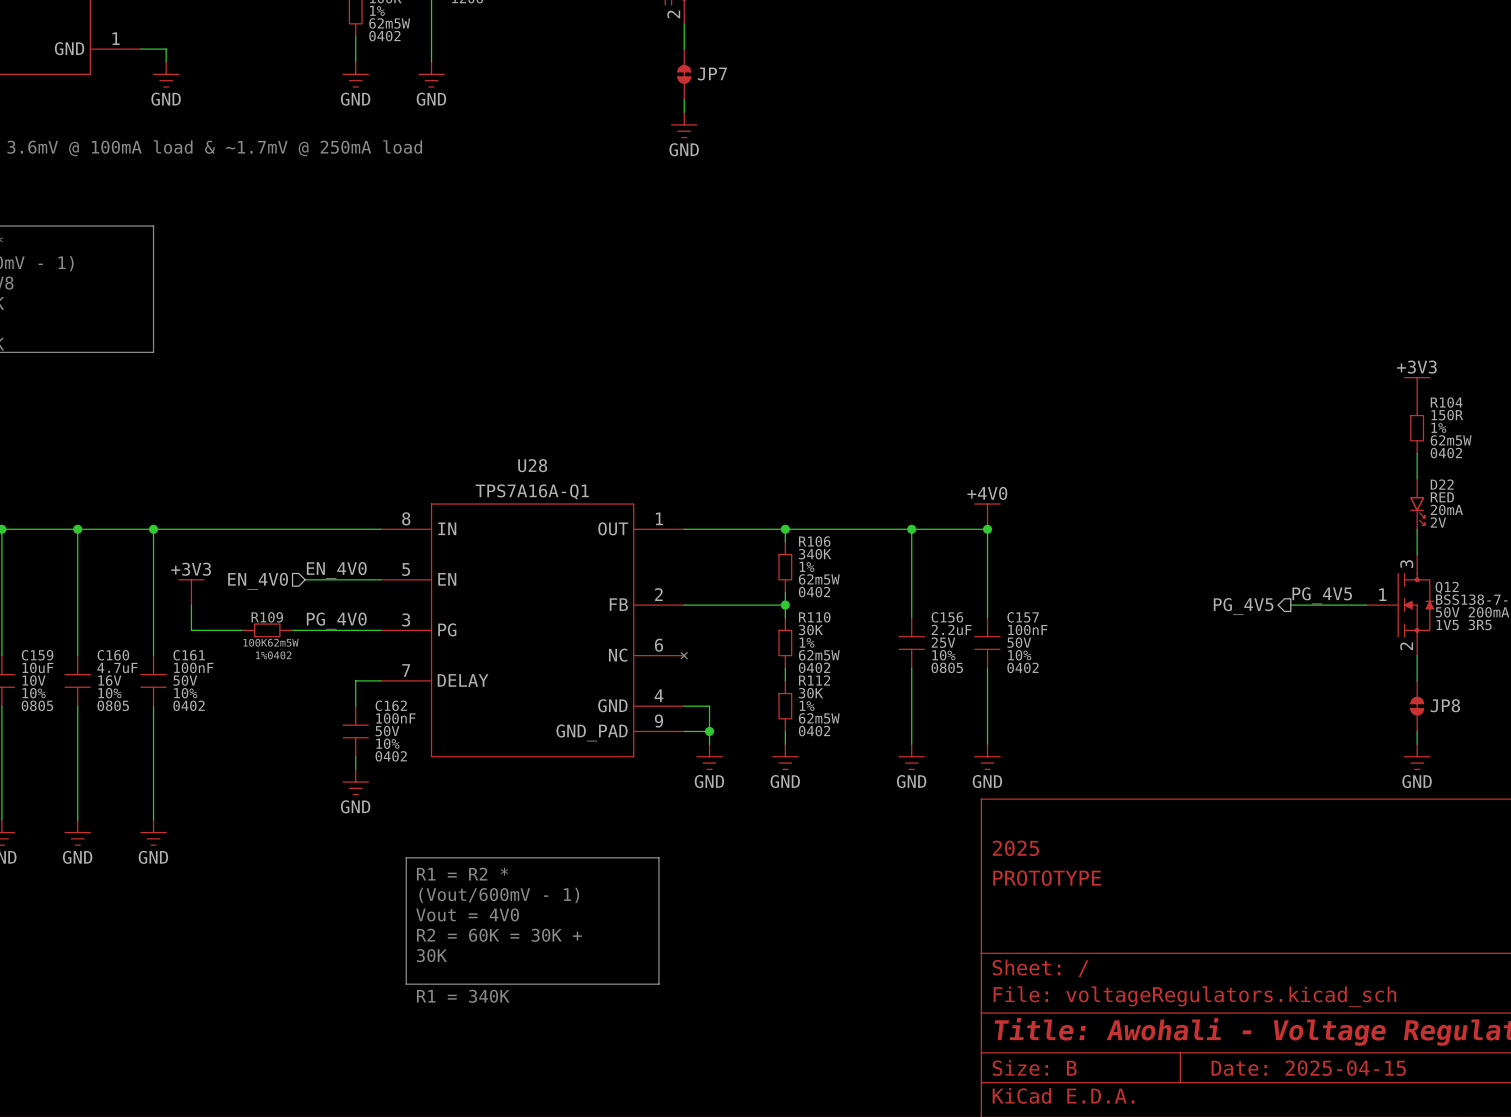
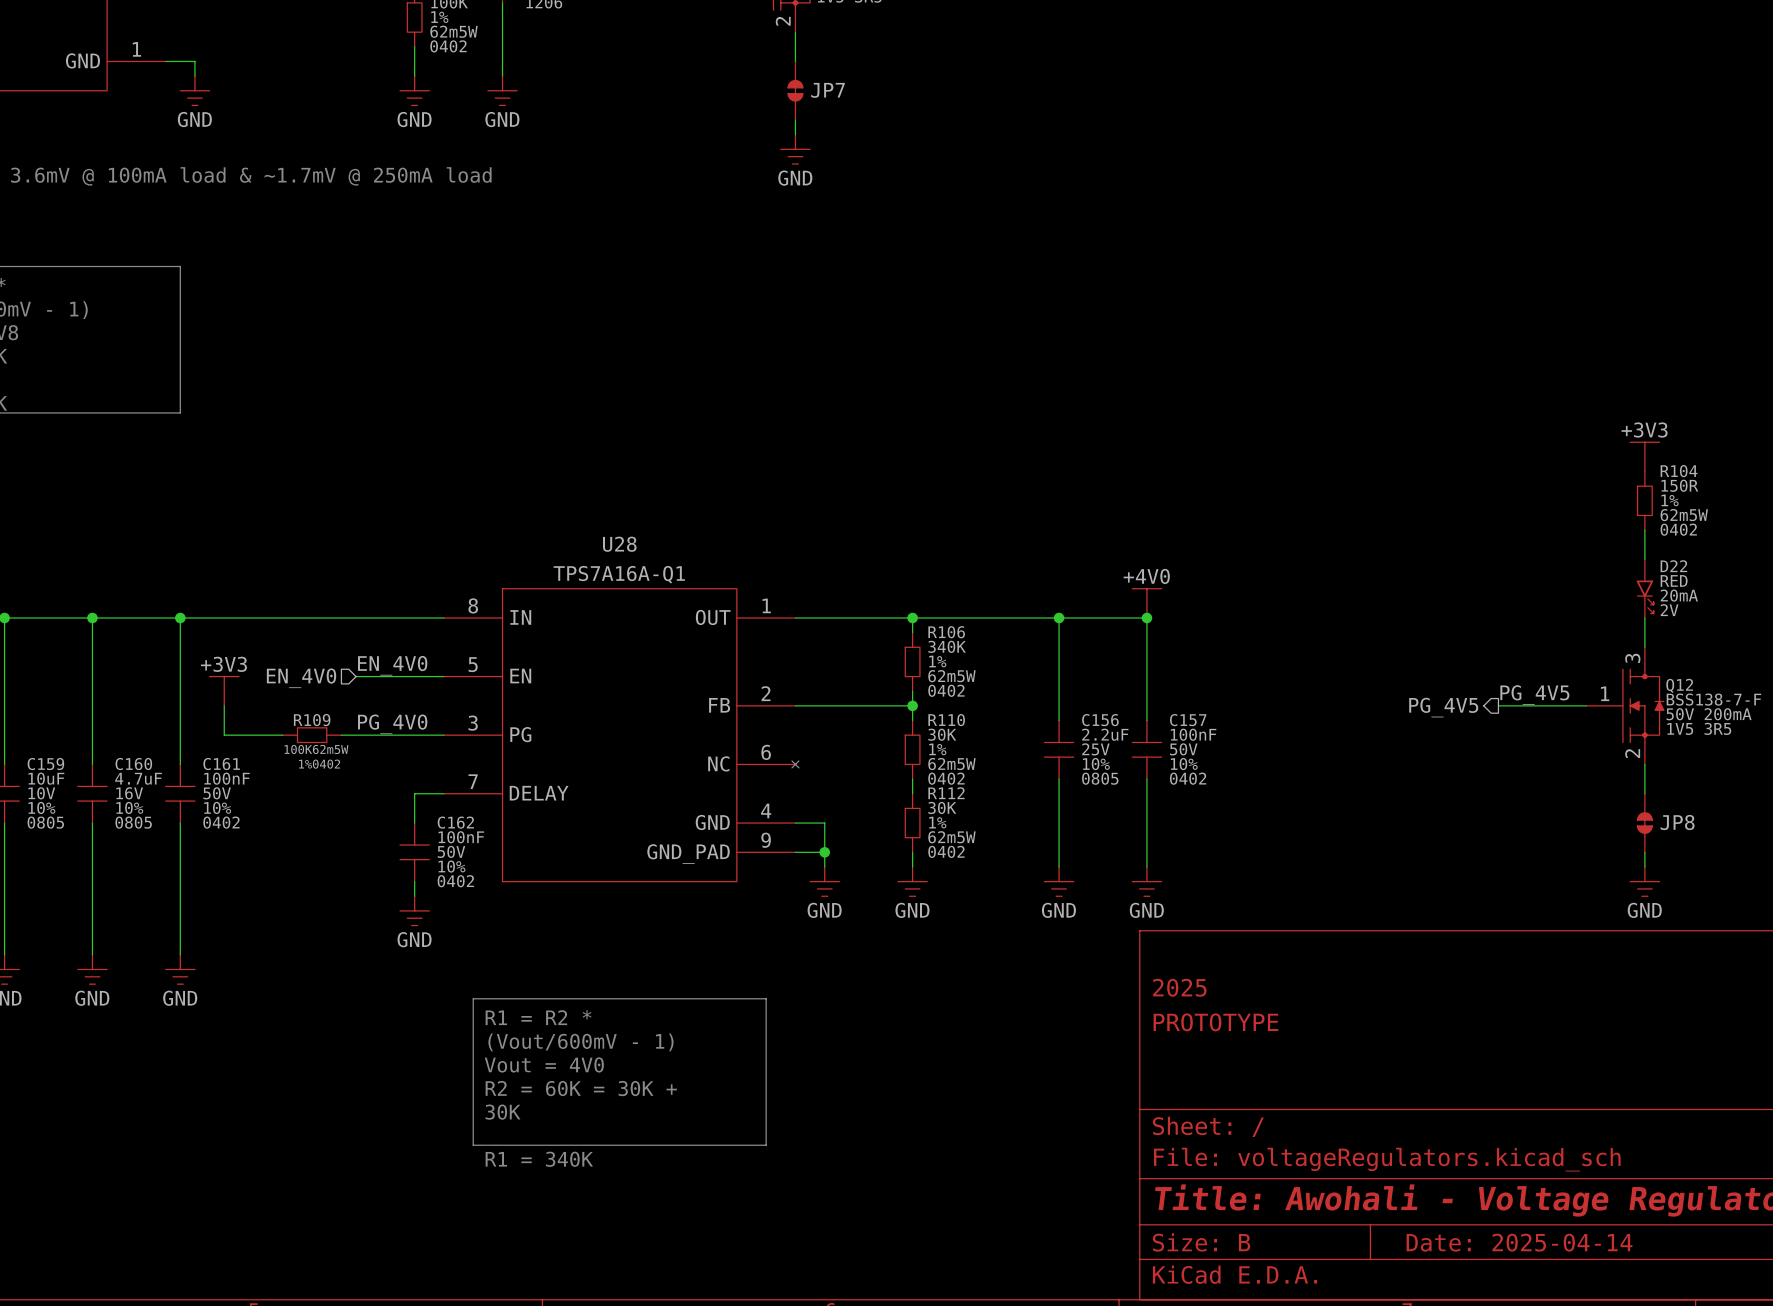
title block: Date: 2025-04-15 (1308, 1068) -> Date: 2025-04-14 (1519, 1242)

